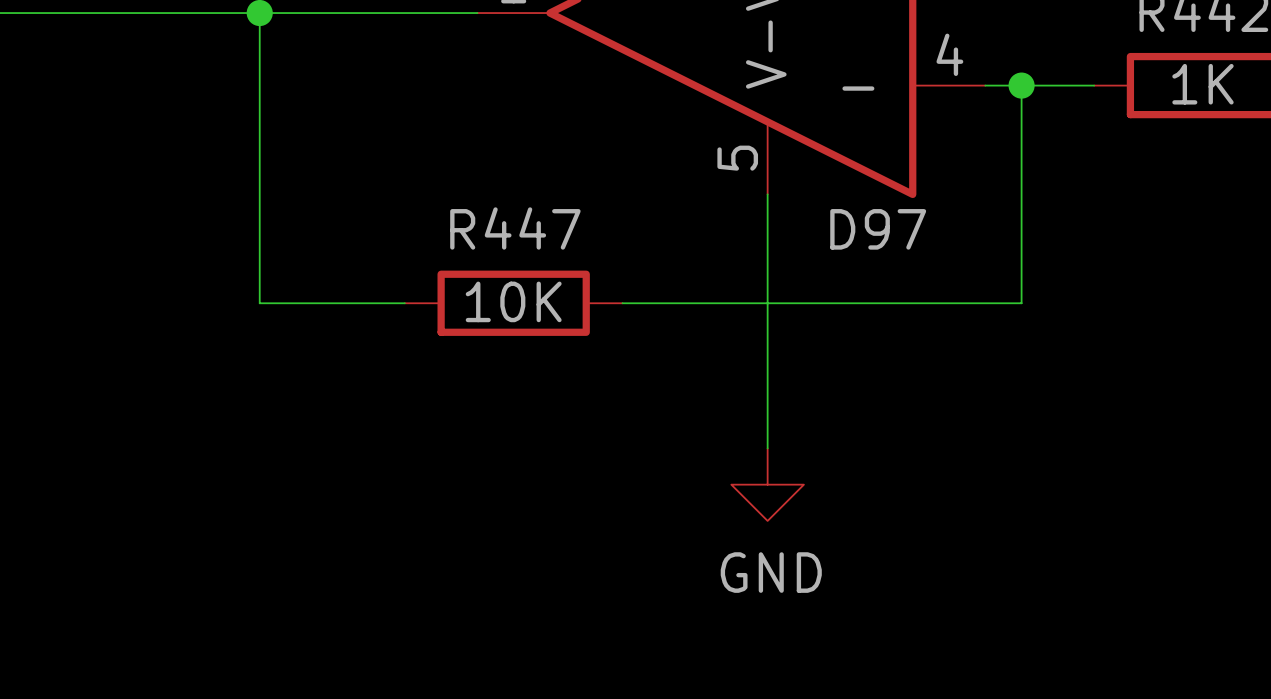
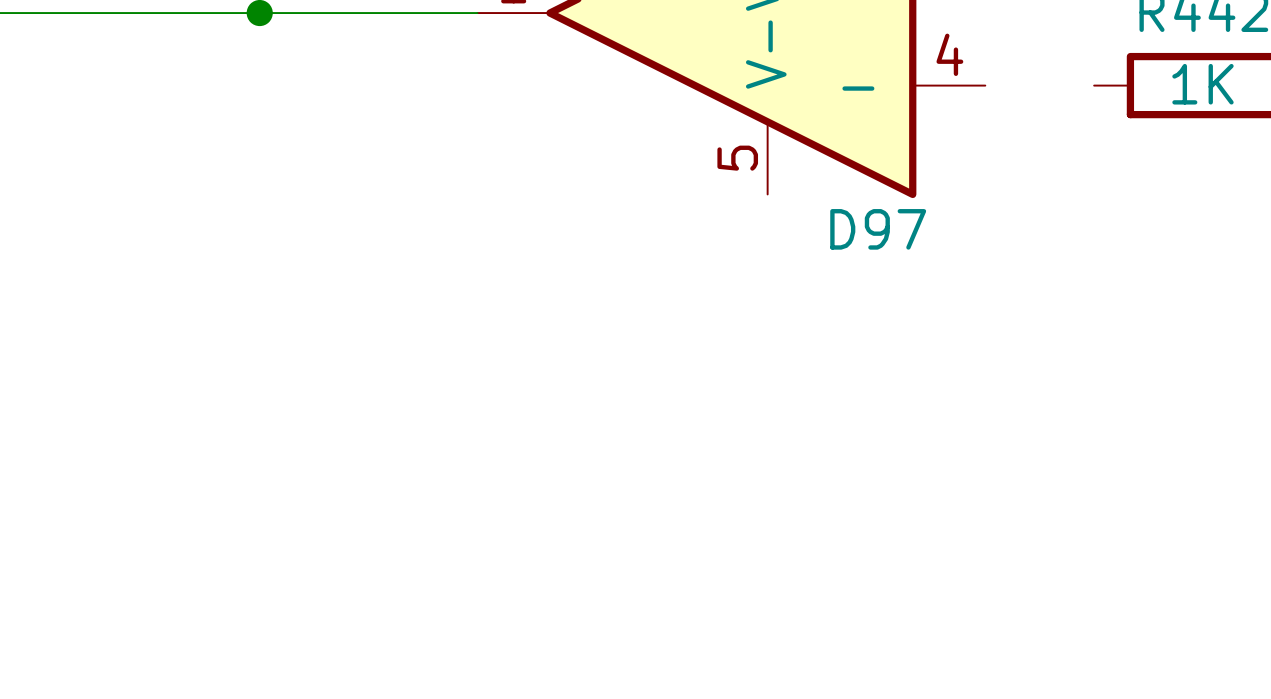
wire: (259, 13) (259, 303) (404, 303) -> none
wire: (985, 85) (1094, 85) -> none
wire: (1021, 85) (1021, 303) (622, 303) -> none
junction: (1021, 85) -> none
wire: (767, 194) (767, 448) -> none
R447: 10K (513, 303) -> none
power symbol: GND (767, 484) -> none

